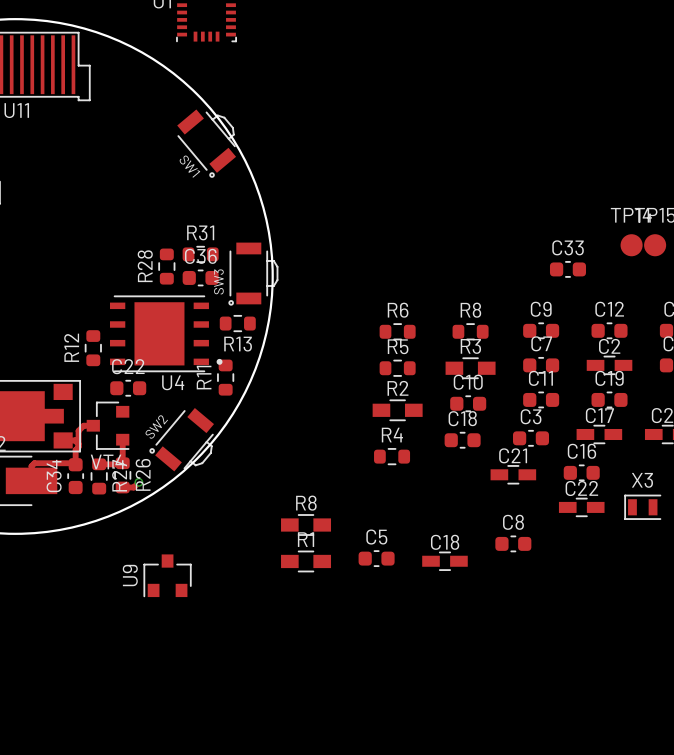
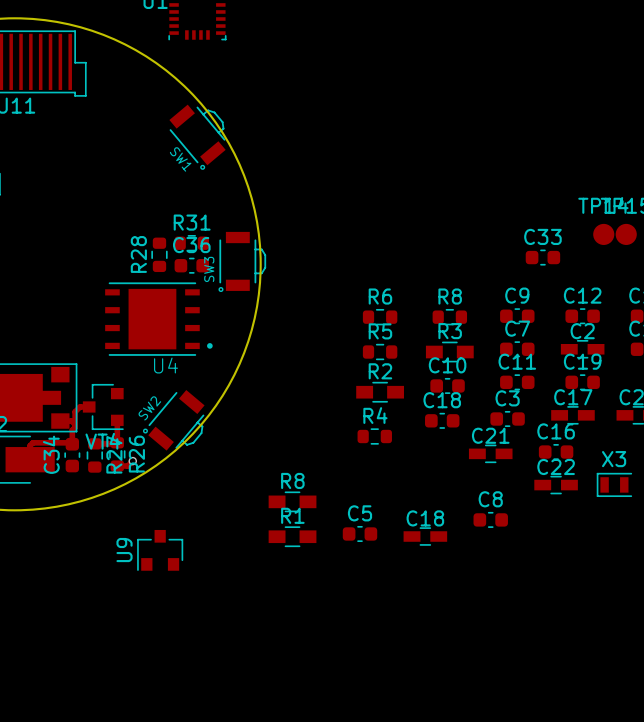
R13: (237, 323) -> none
R12: (93, 348) -> none
R11: (225, 377) -> none
C22: (128, 388) -> none

